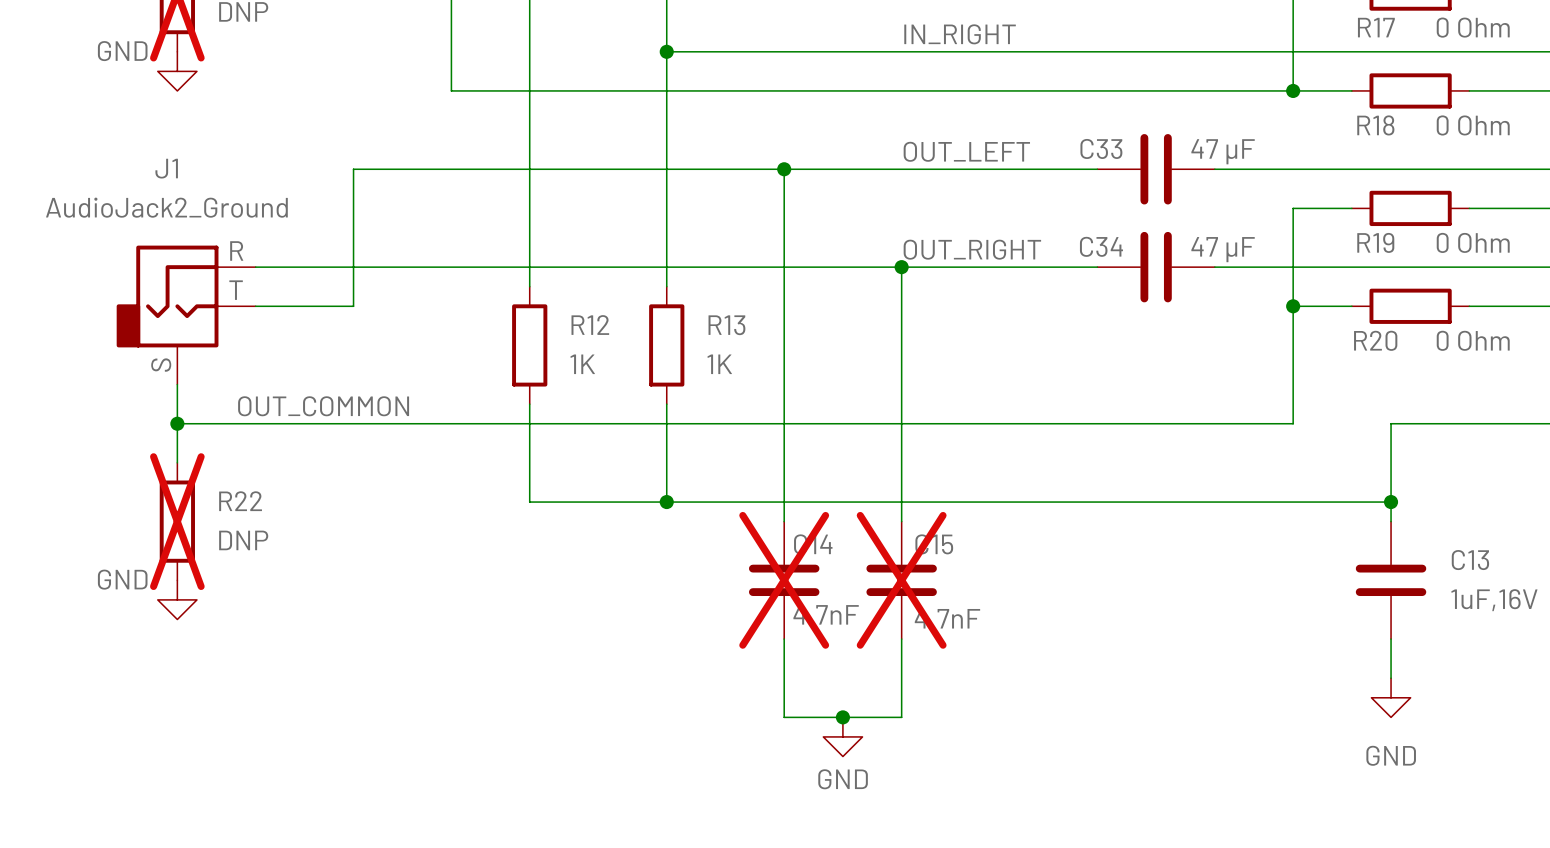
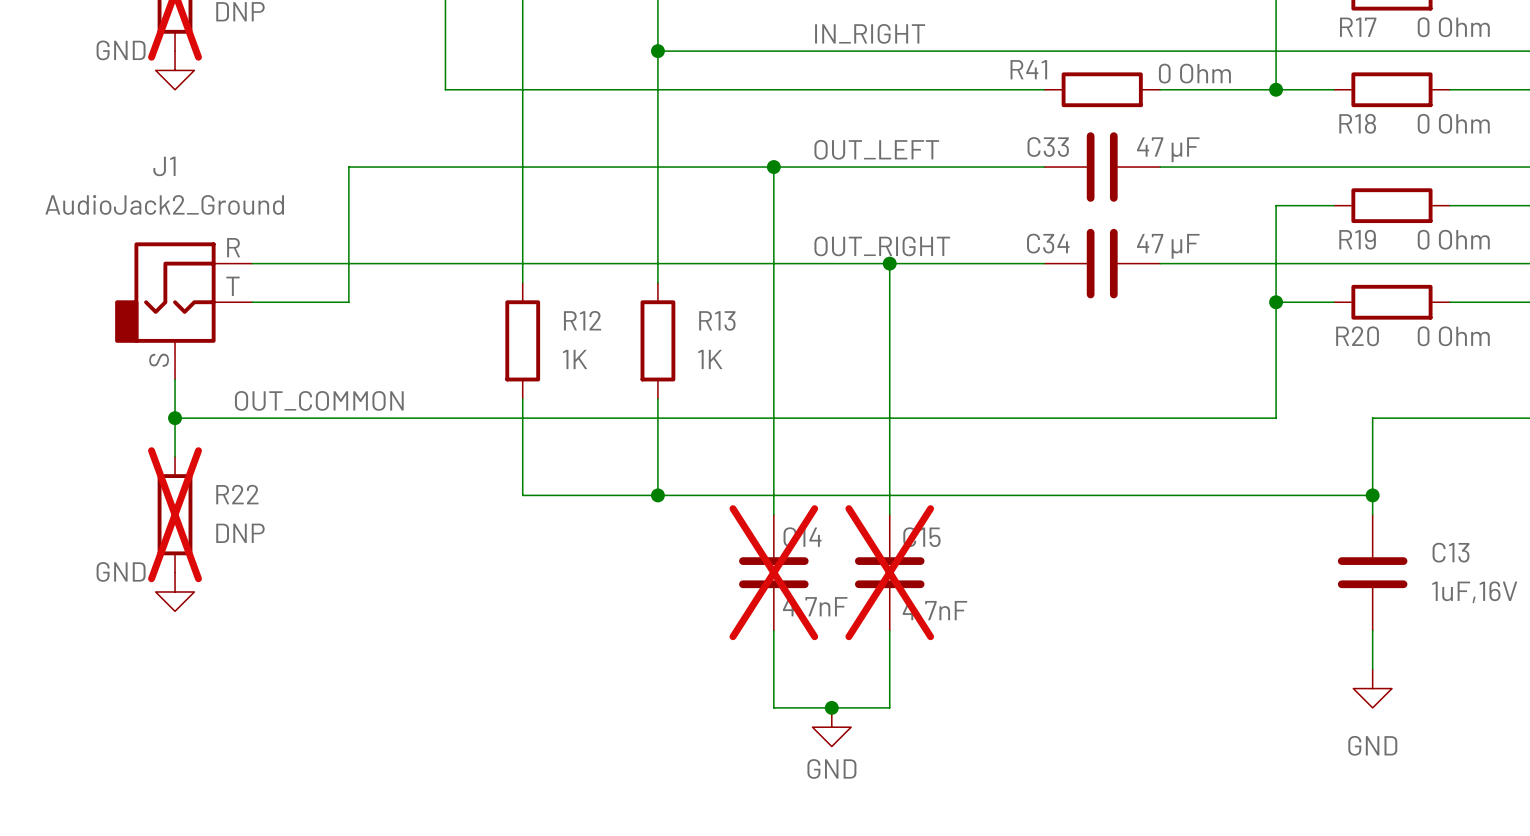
label position: IN_RIGHT (960, 34) -> IN_RIGHT (870, 33)
wire: (1058, 90) (1175, 90) -> none
R41: none -> 0 Ohm (1102, 89)
label position: OUT_LEFT (966, 151) -> OUT_LEFT (876, 149)
C33 position: (1156, 169) -> (1102, 167)
label position: OUT_RIGHT (972, 249) -> OUT_RIGHT (882, 246)
C34 position: (1156, 267) -> (1102, 263)

